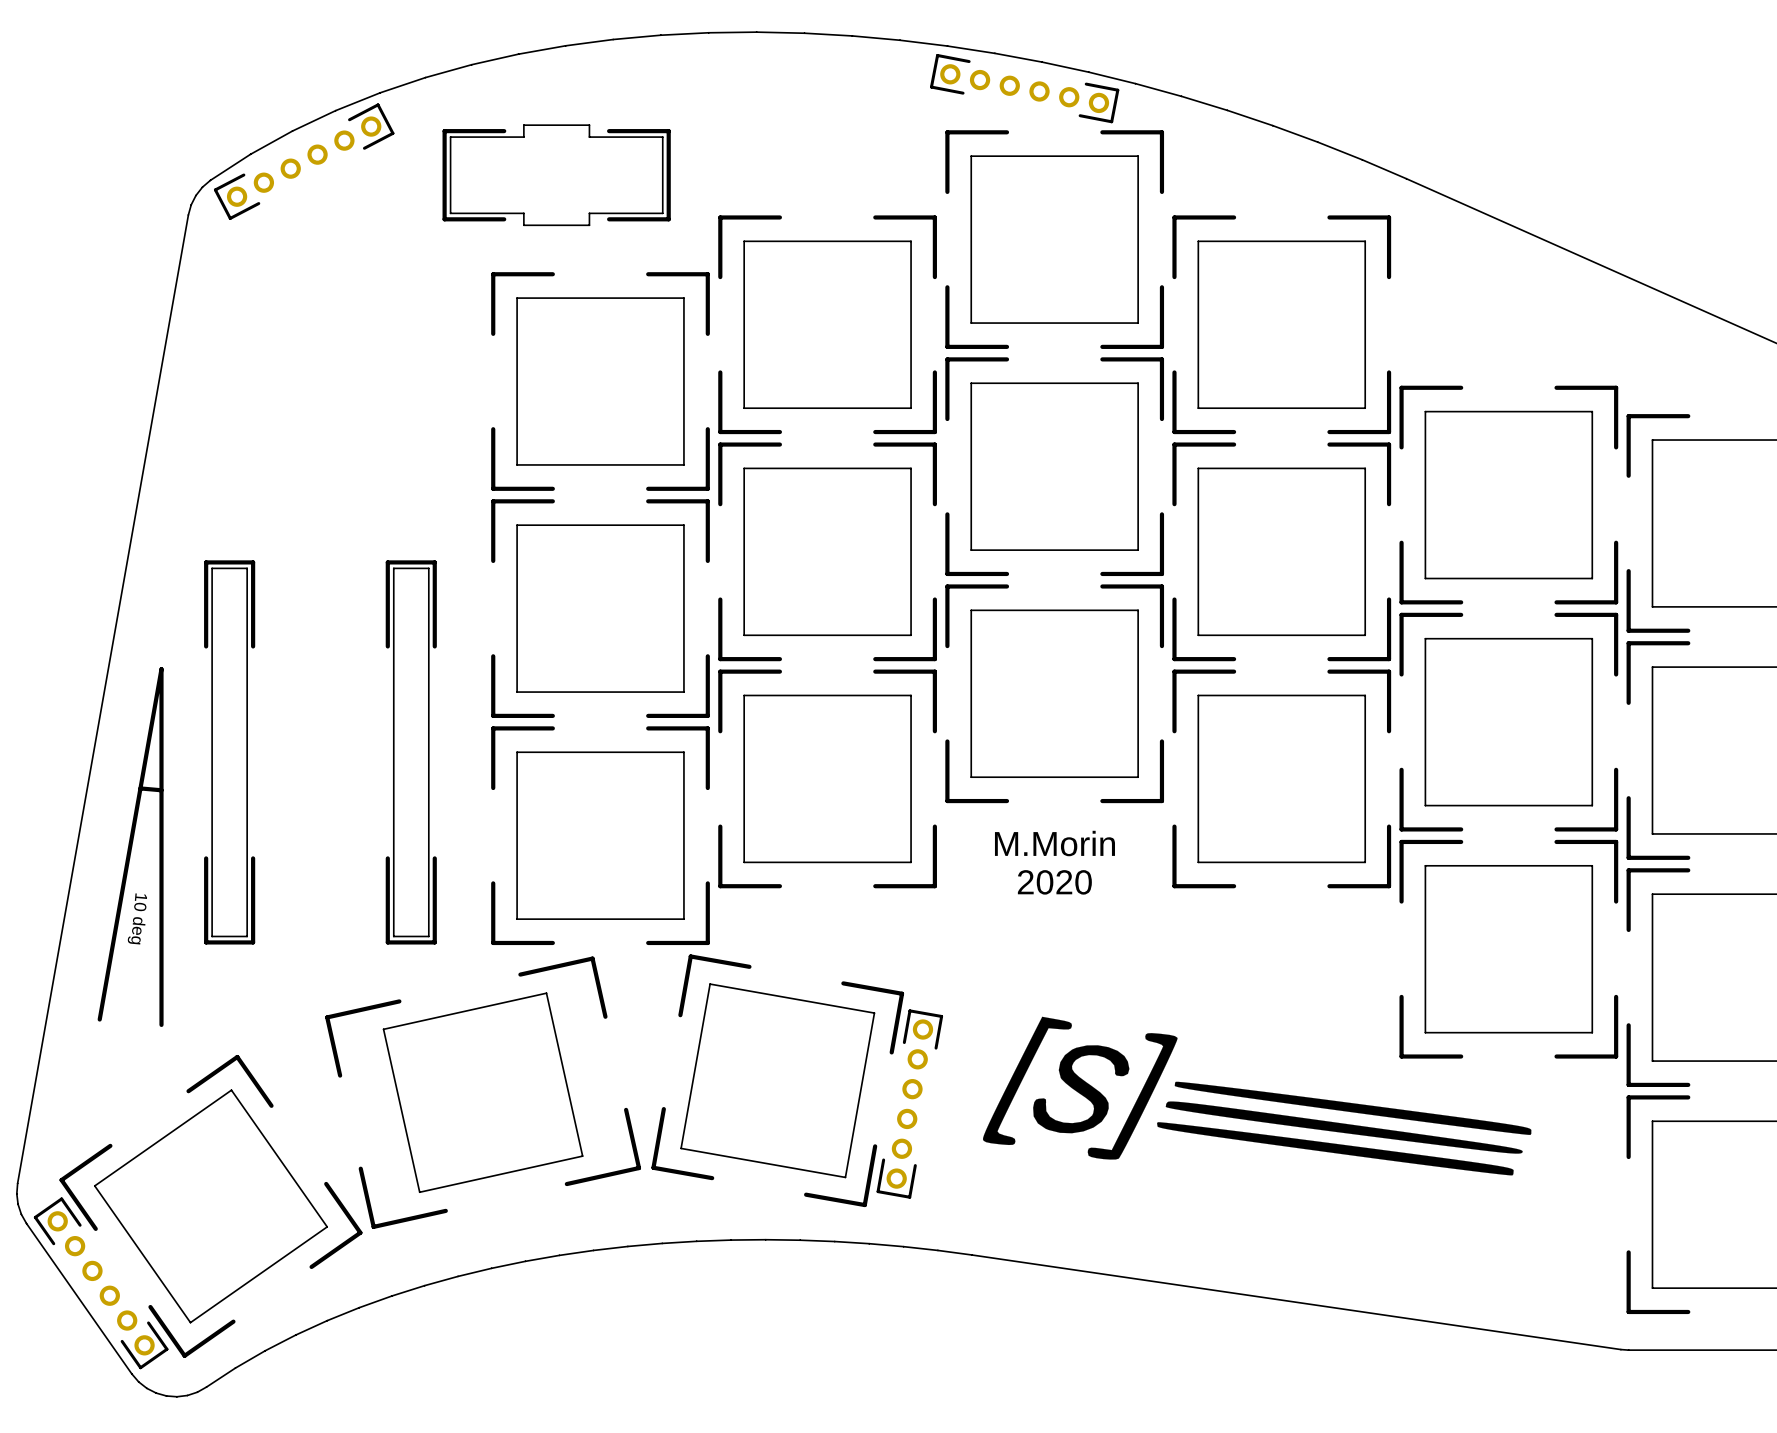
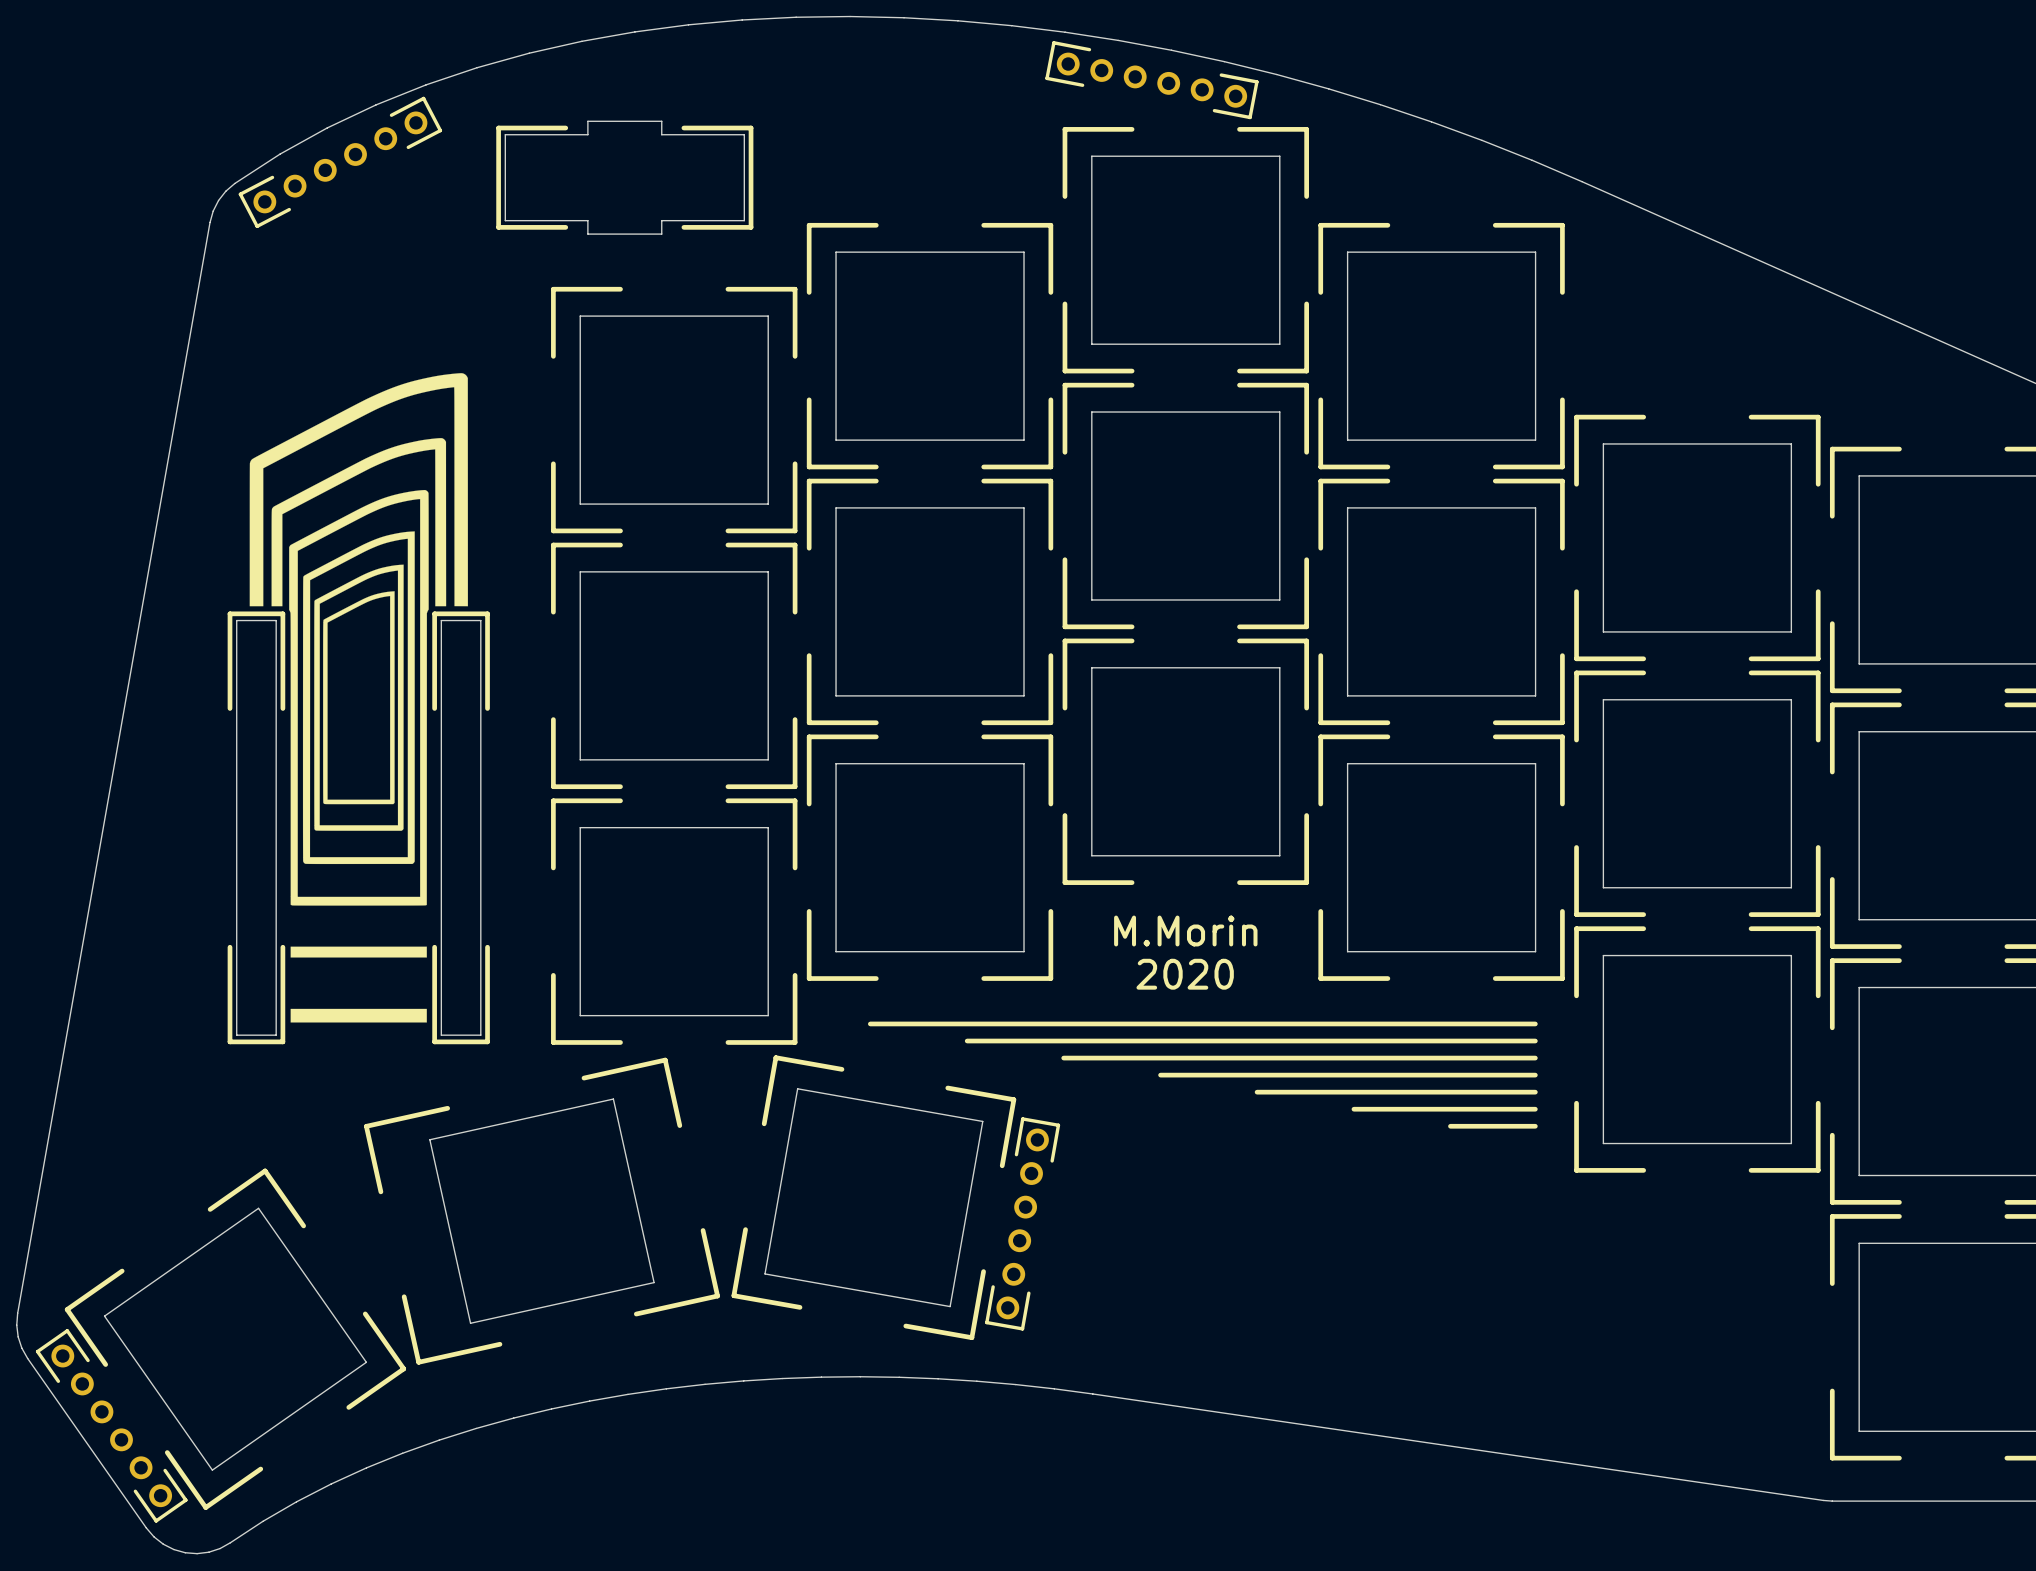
drawing: none -> [249, 373, 468, 1023]
line: (140, 788) (161, 790) -> none
text: 10 deg (137, 918) -> none
line: none -> (1535, 1023) (870, 1023)
line: none -> (1535, 1041) (967, 1041)
line: none -> (1535, 1058) (1063, 1058)
line: none -> (1535, 1075) (1160, 1075)
line: none -> (1535, 1092) (1257, 1092)
line: none -> (1535, 1109) (1353, 1109)
drawing: [982, 1016, 1532, 1176] -> none
line: none -> (1535, 1126) (1450, 1126)
line: (99, 1019) (161, 669) (161, 1024) -> none

